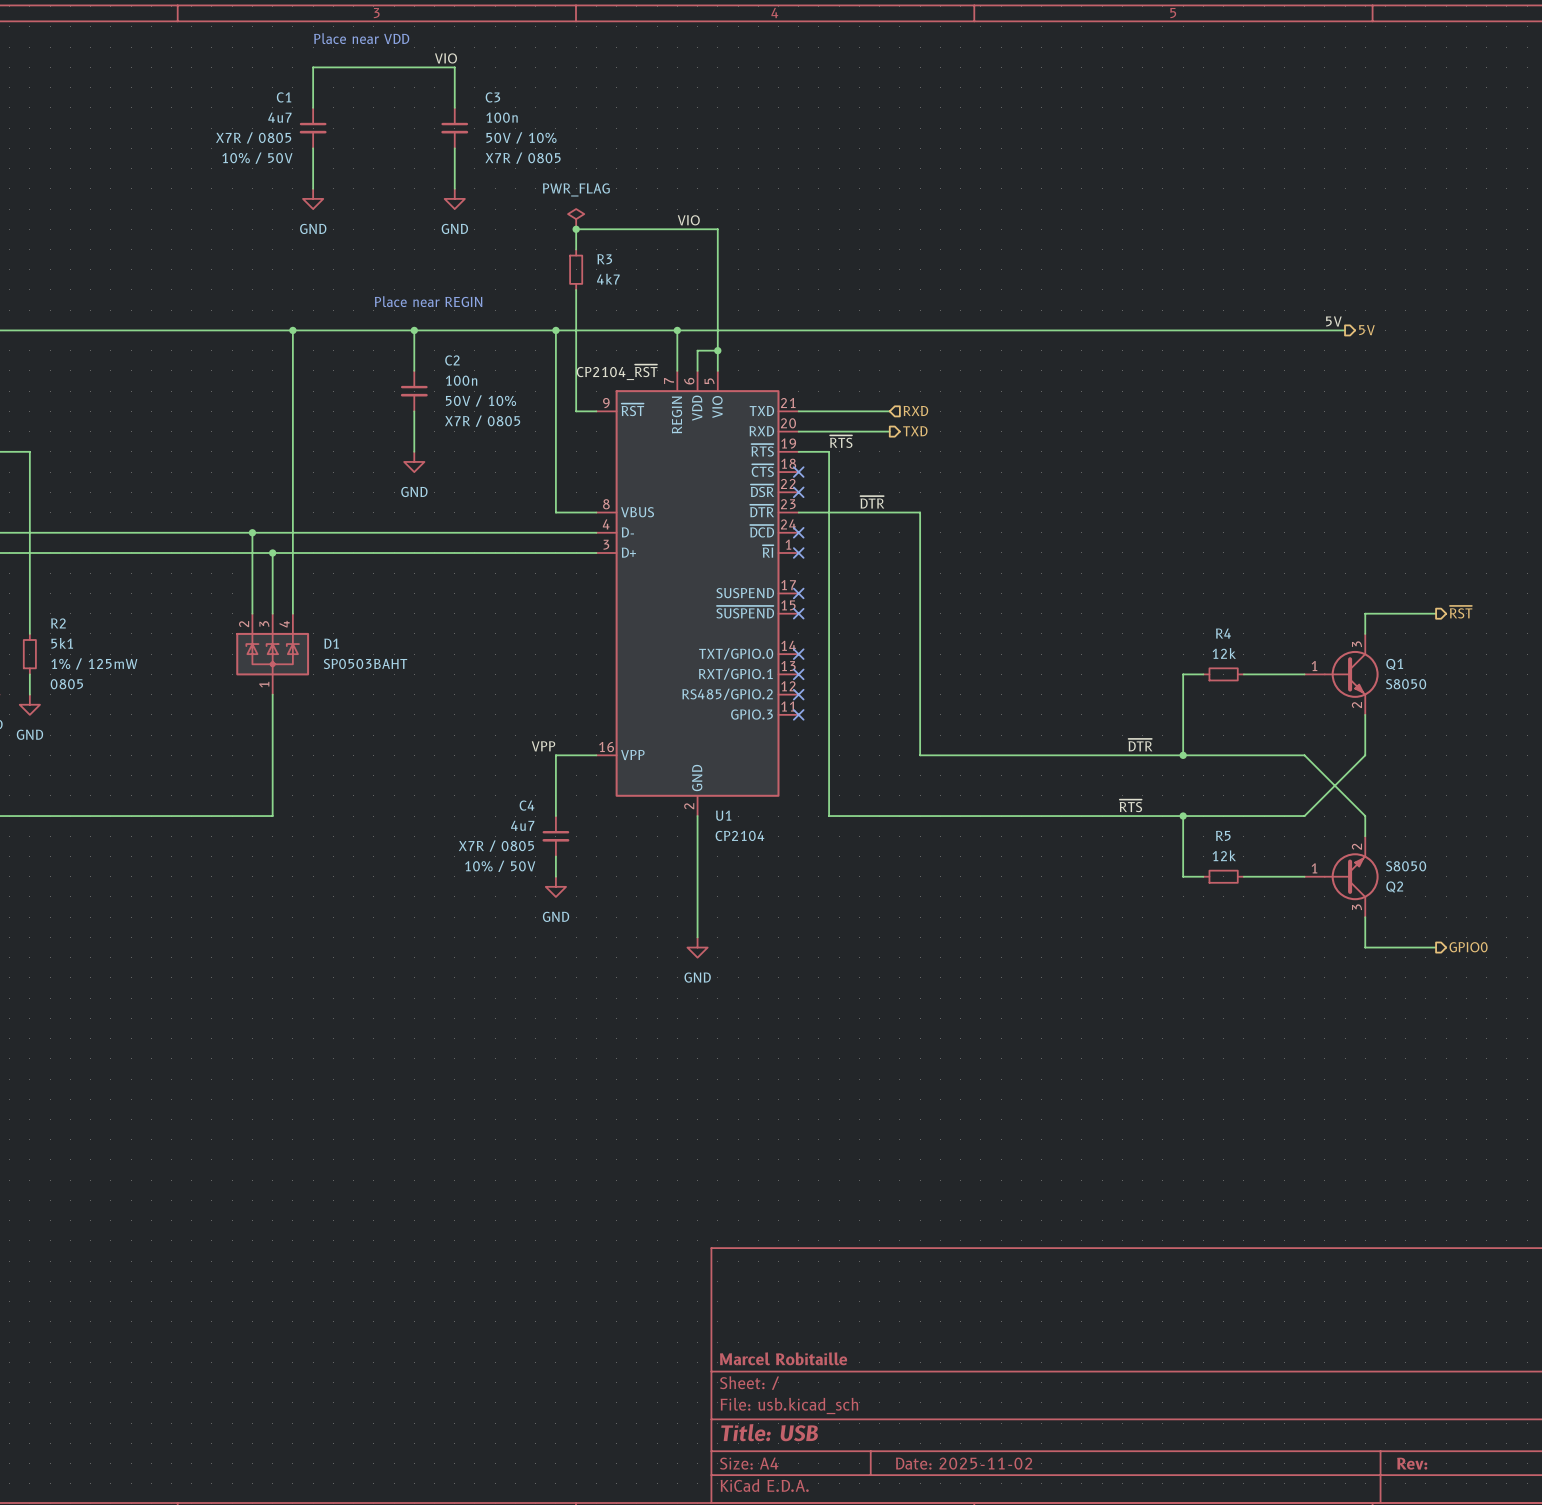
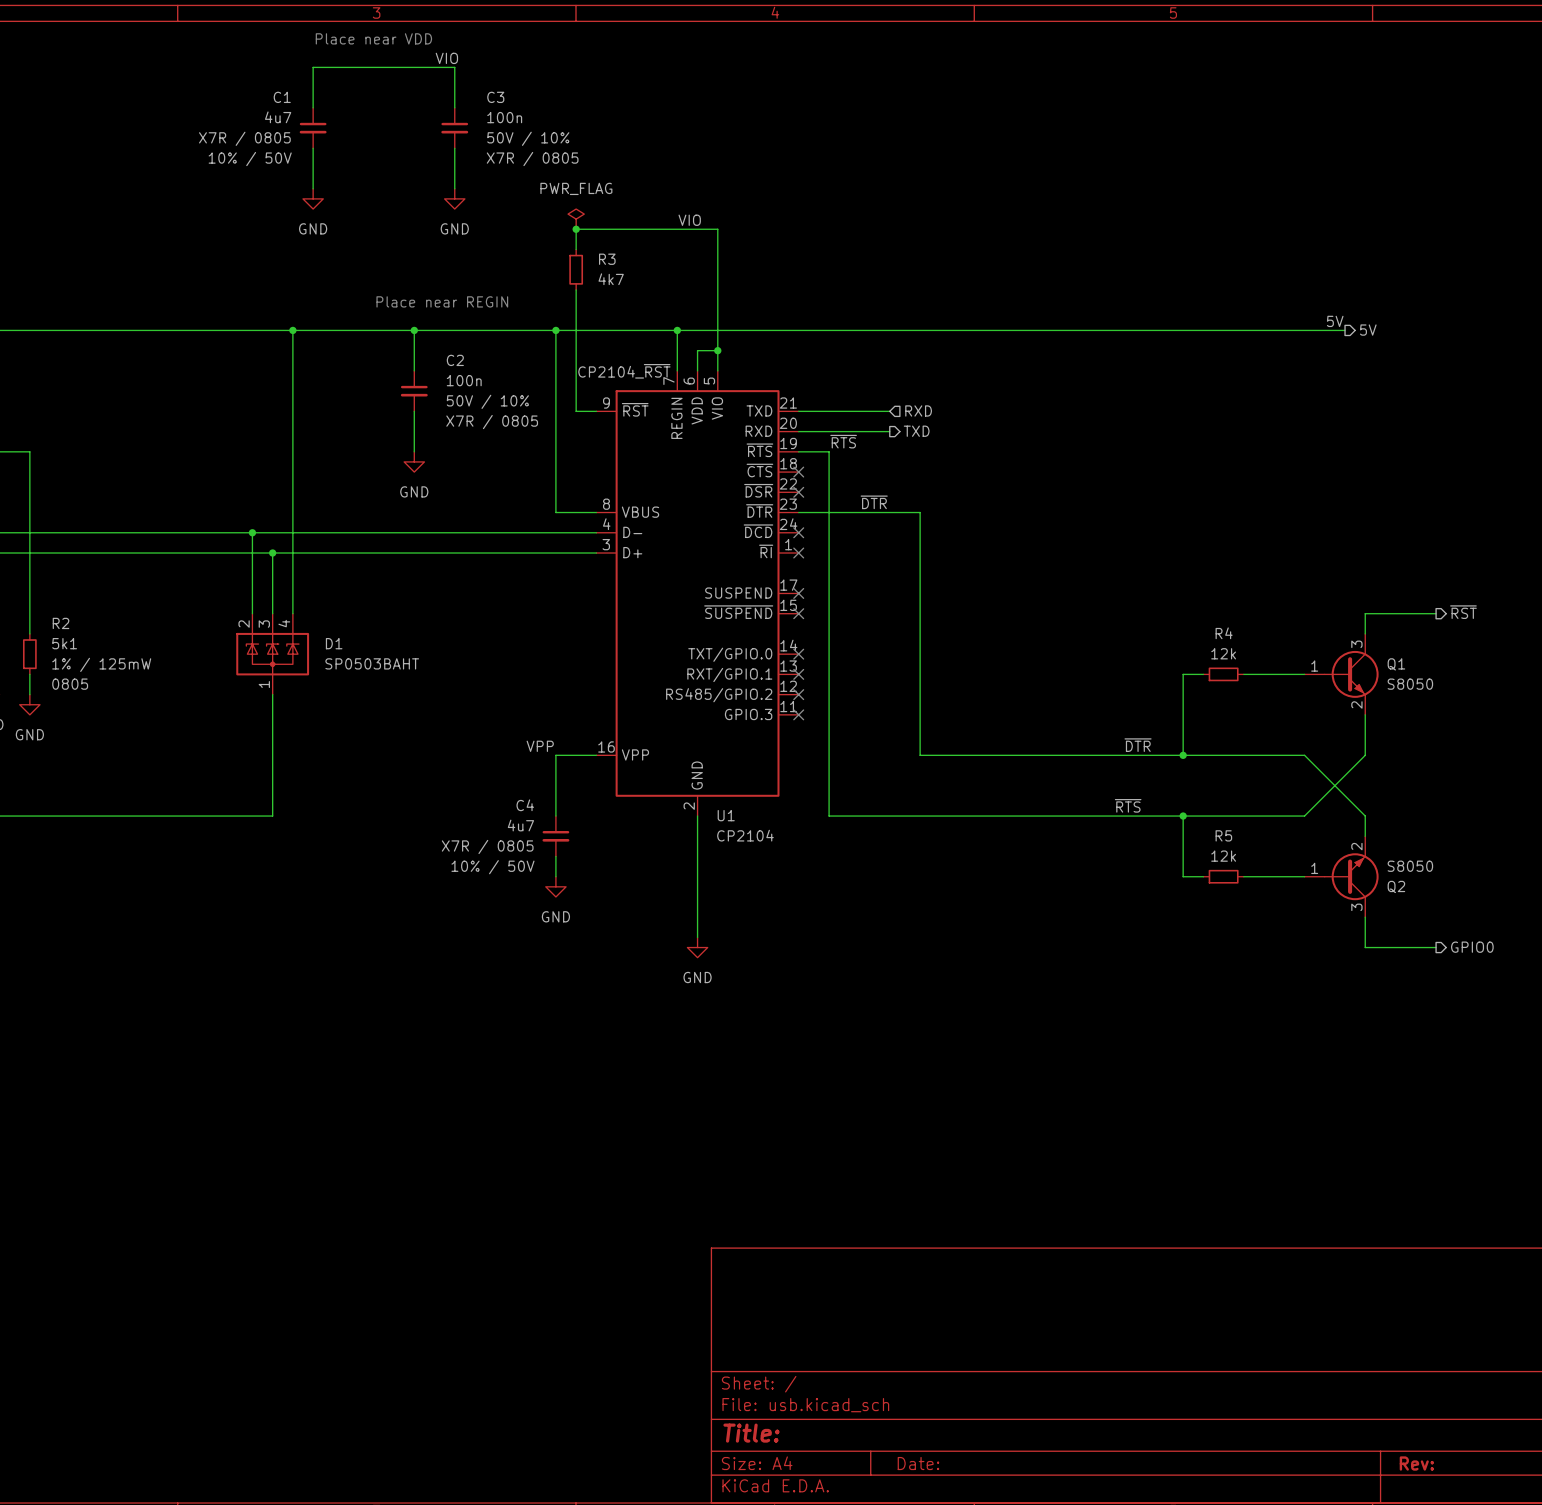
title block: Marcel Robitaille (783, 1358) -> none
title block: Title: USB (769, 1432) -> Title: (751, 1433)
title block: Date: 2025-11-02 (964, 1463) -> Date: (918, 1463)

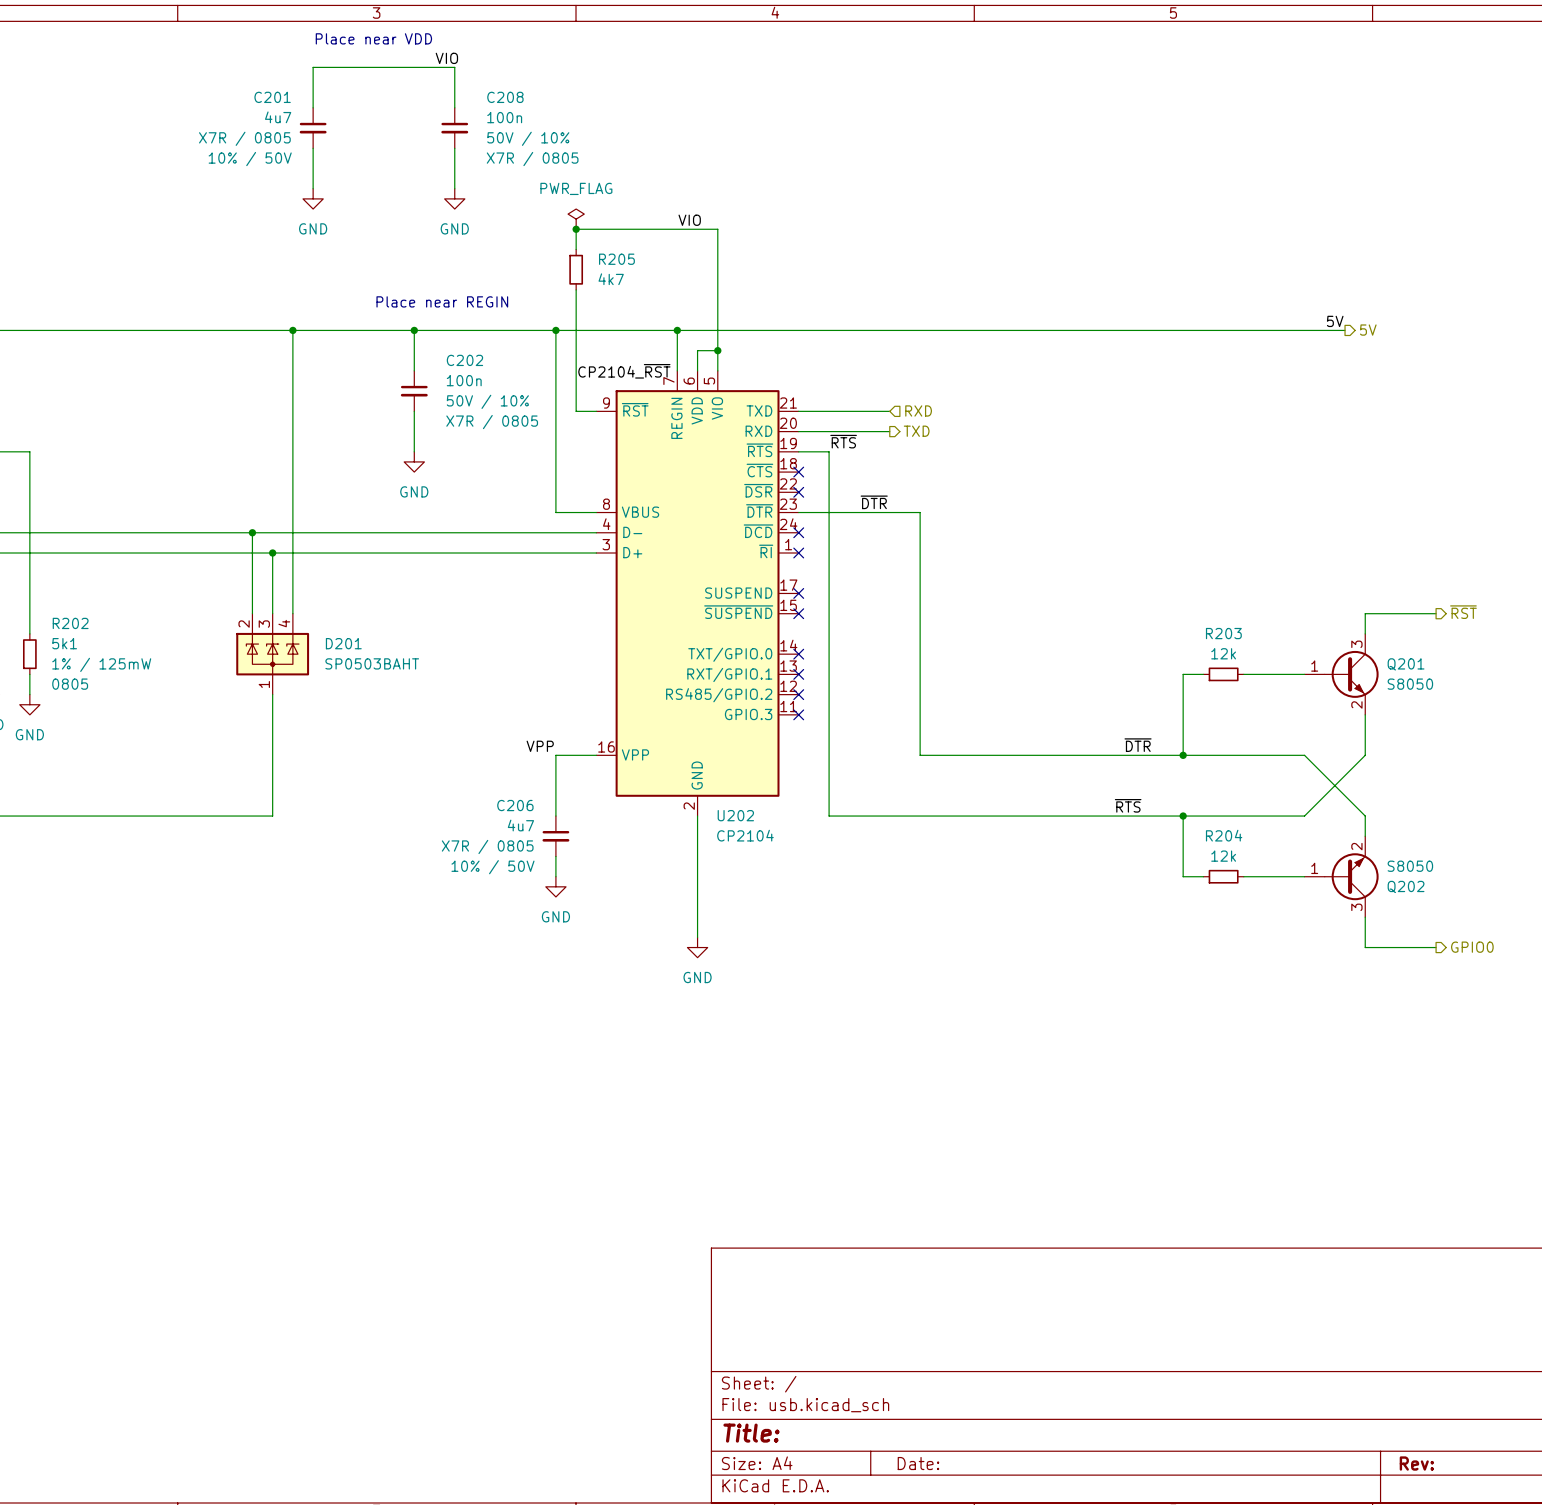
C1 name: C1 (282, 97) -> C201 (272, 97)
C3 name: C3 (495, 97) -> C208 (505, 97)
R3 name: R3 (607, 259) -> R205 (616, 259)
C2 name: C2 (455, 360) -> C202 (464, 360)
R2 name: R2 (61, 623) -> R202 (70, 623)
R4 name: R4 (1224, 633) -> R203 (1223, 633)
D1 name: D1 (334, 643) -> D201 (343, 643)
Q1 name: Q1 (1396, 664) -> Q201 (1406, 664)
C4 name: C4 (525, 805) -> C206 (515, 805)
U1 name: U1 (726, 815) -> U202 (735, 815)
R5 name: R5 (1223, 835) -> R204 (1224, 835)
Q2 name: Q2 (1396, 886) -> Q202 (1406, 886)

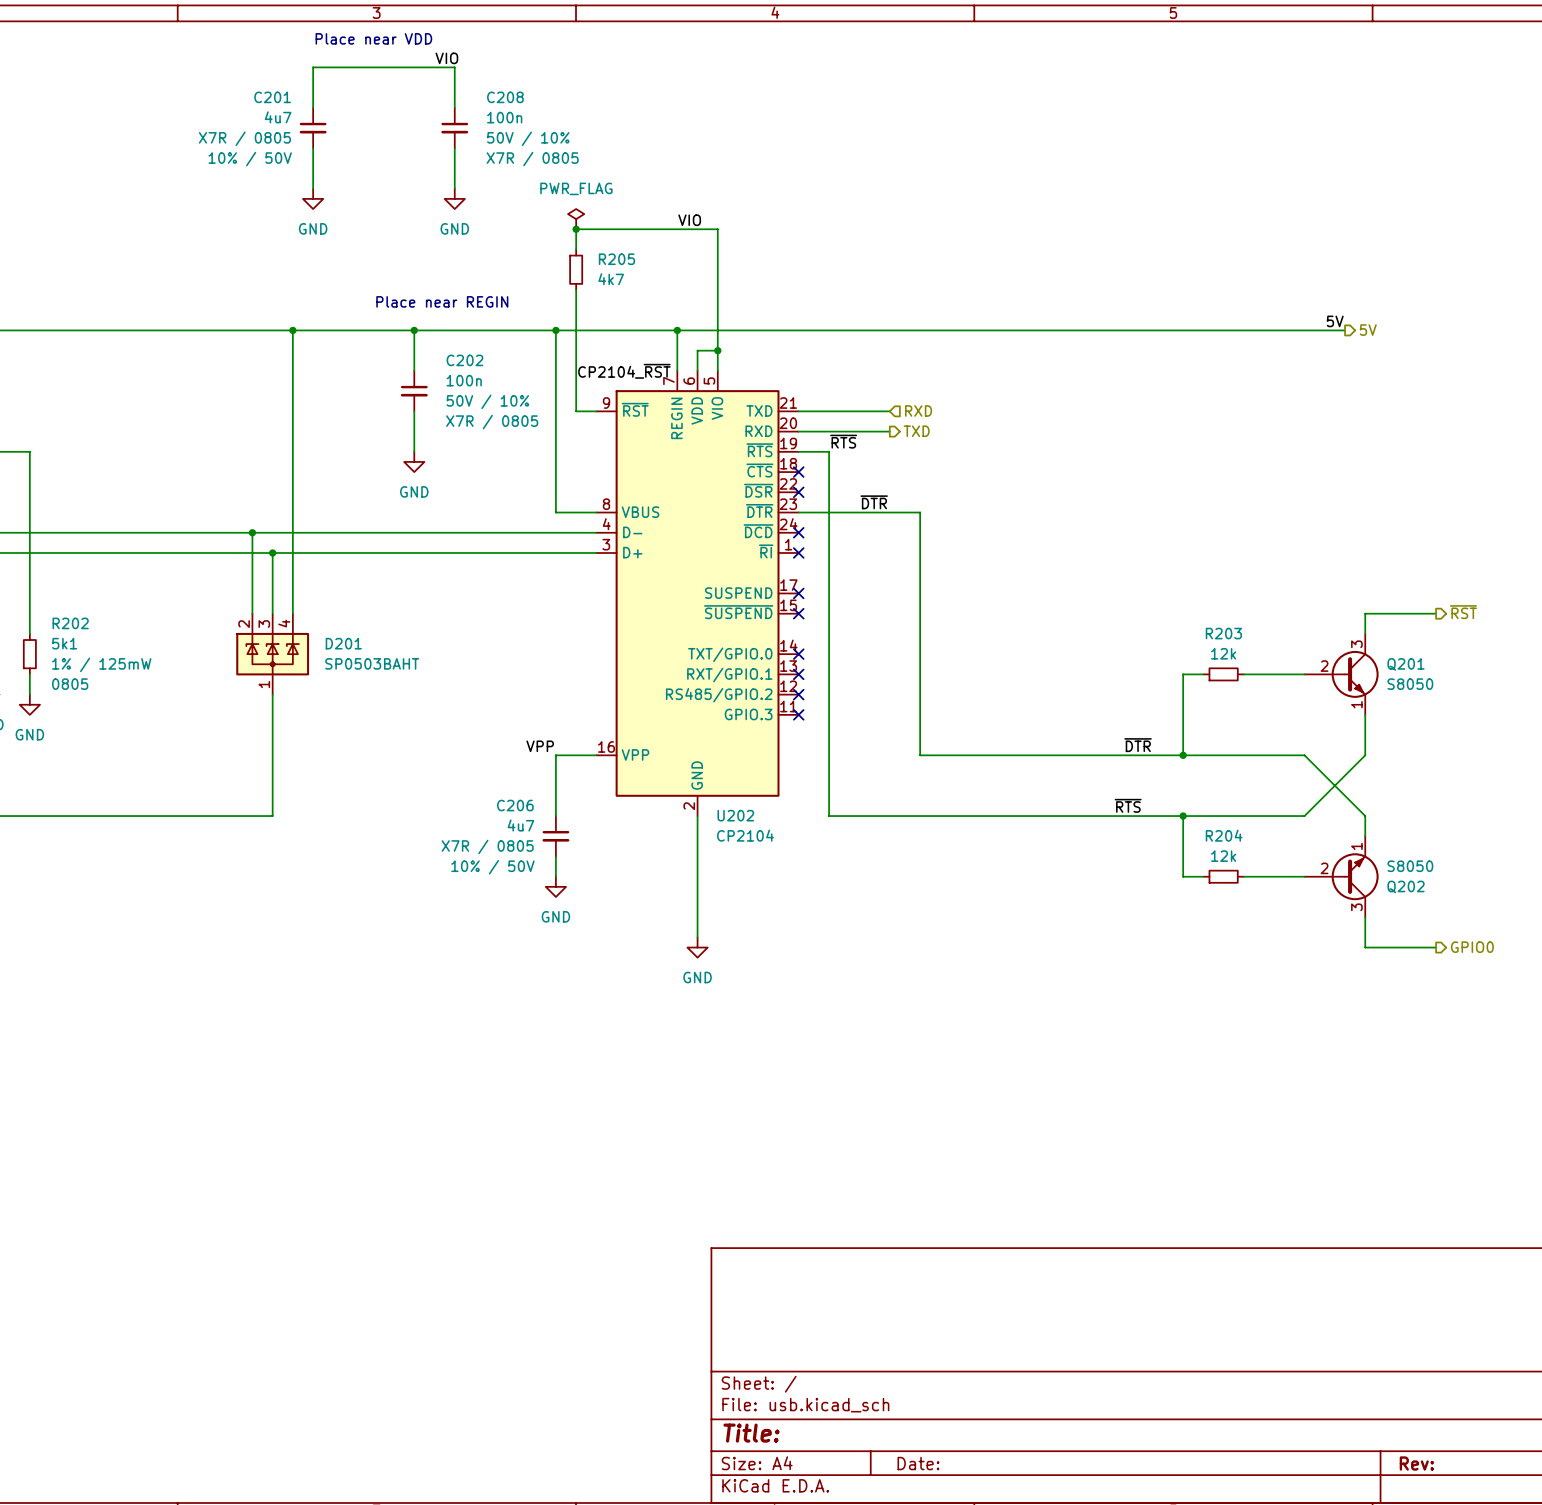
Q201 symbol: [1304, 633, 1379, 715] -> [1304, 633, 1379, 715]
Q202 symbol: [1304, 836, 1379, 918] -> [1304, 836, 1379, 918]

